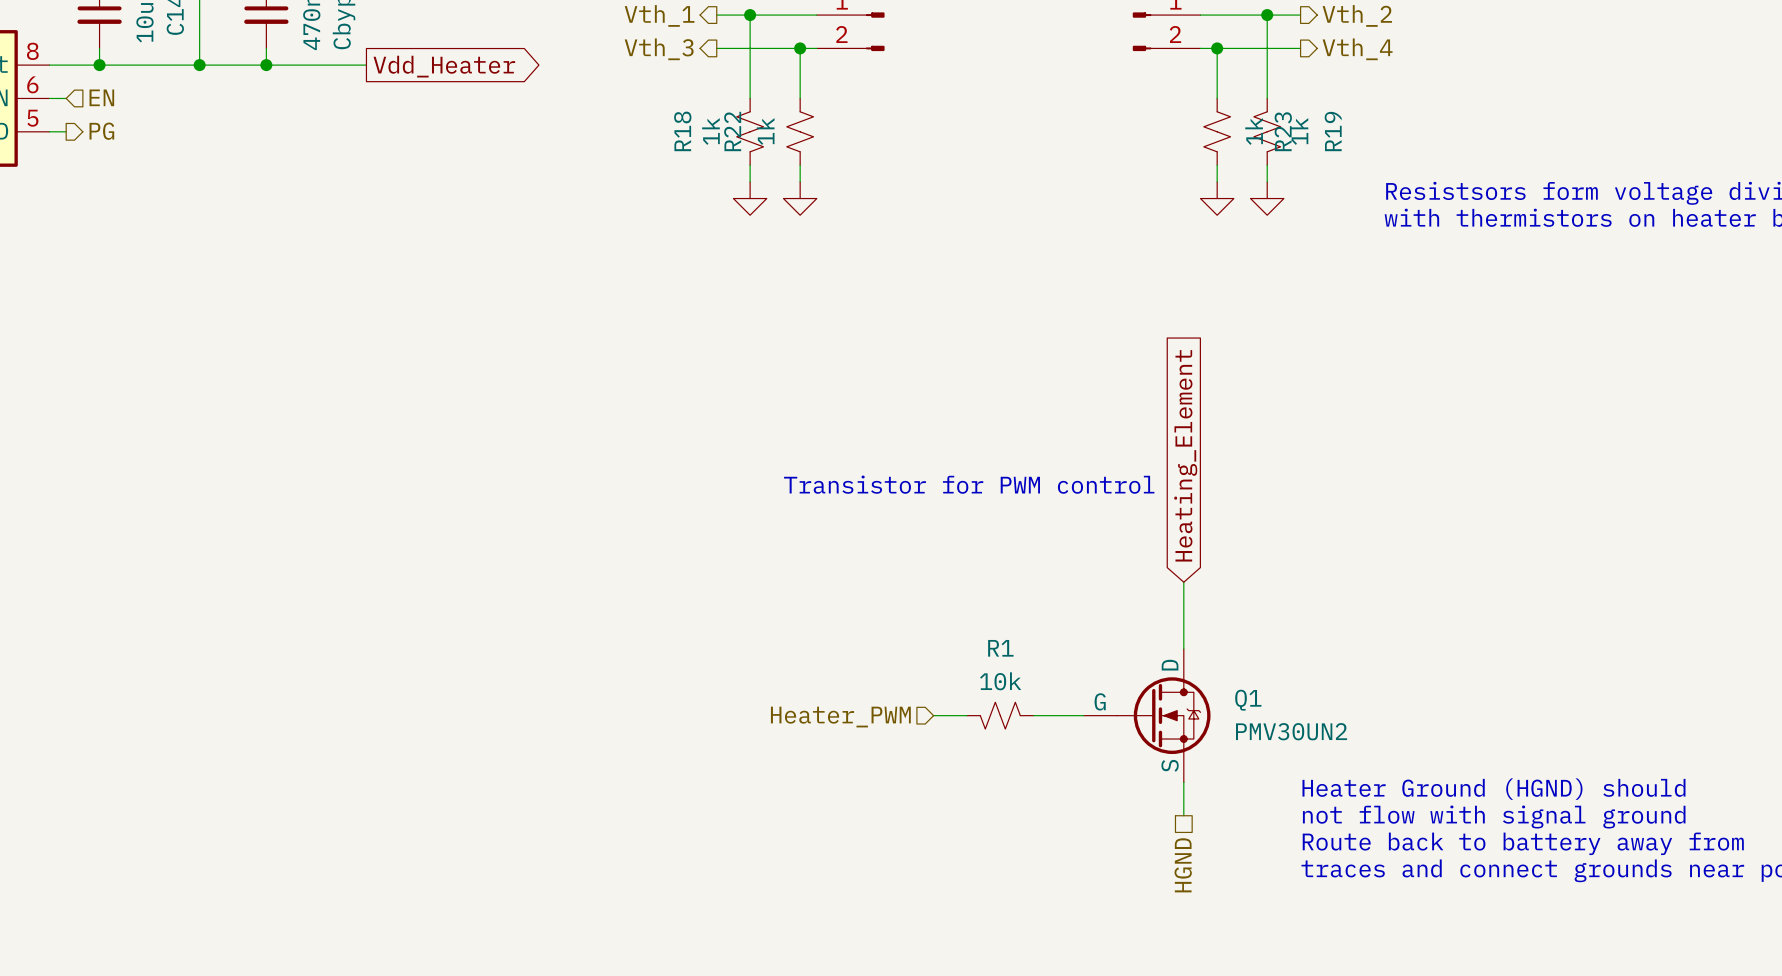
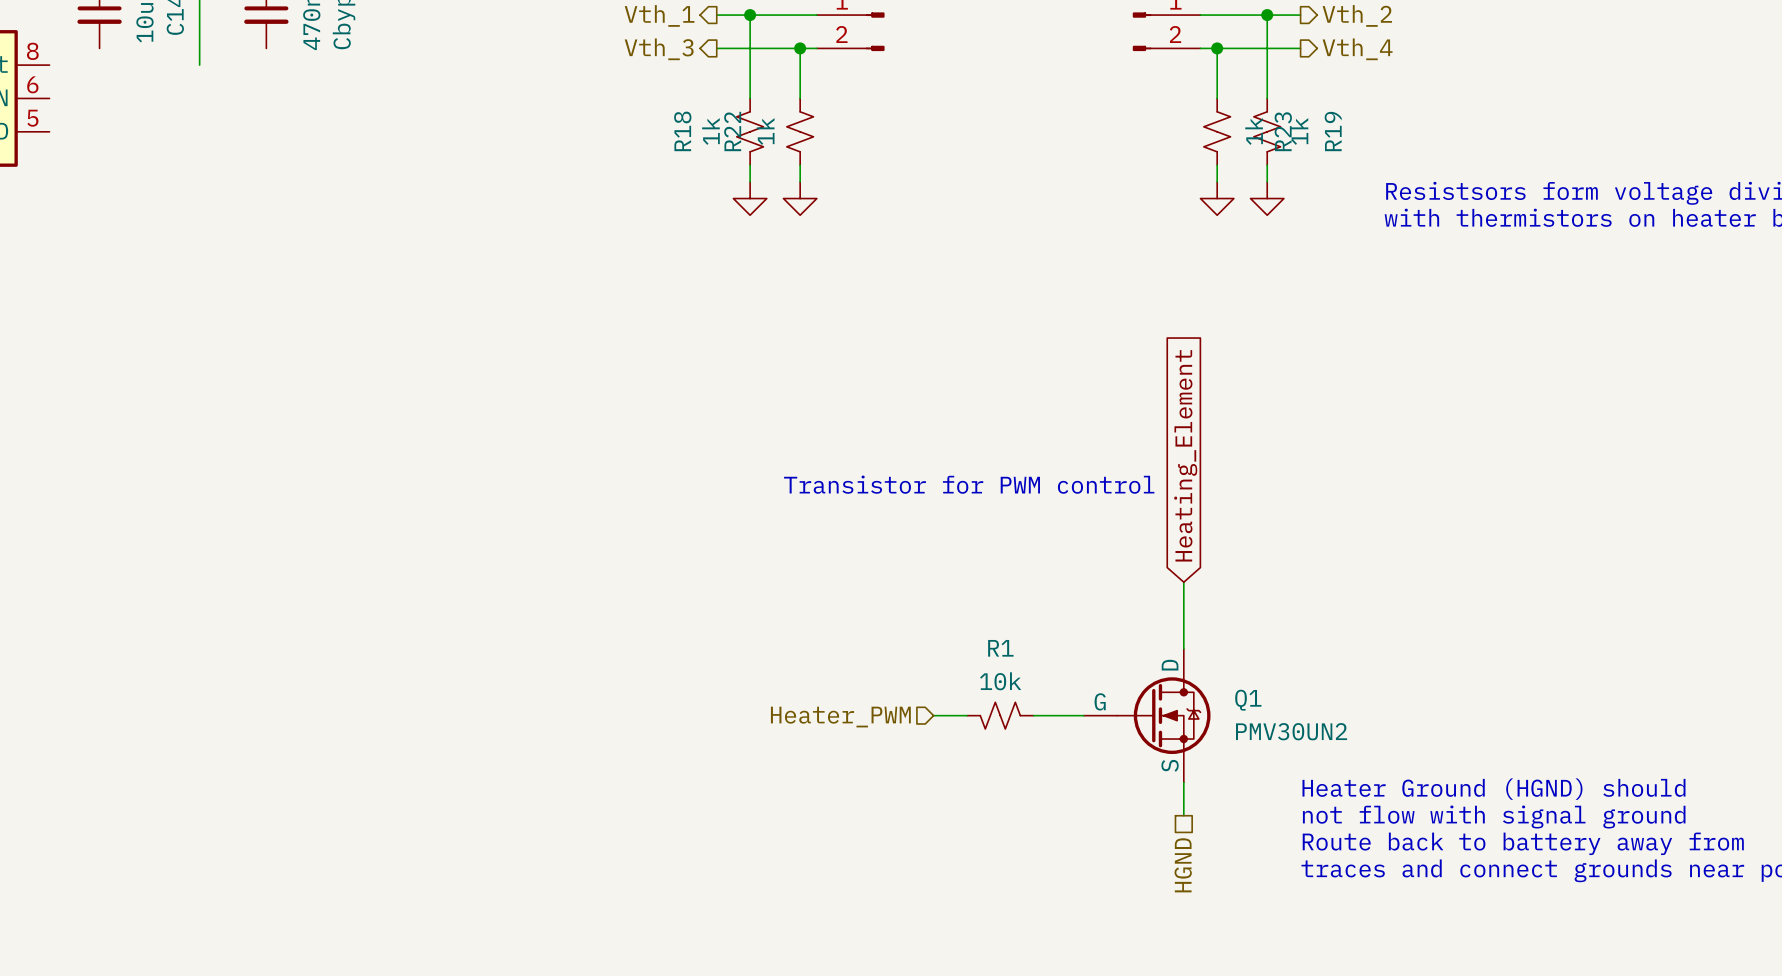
wire: (99, 48) (99, 65) -> none
wire: (266, 48) (266, 65) -> none
wire: (49, 65) (366, 65) -> none
junction: (99, 65) -> none
junction: (199, 65) -> none
junction: (266, 65) -> none
global label: Vdd_Heater (444, 66) -> none
hierarchical label: EN (101, 97) -> none
wire: (49, 98) (66, 98) -> none
wire: (49, 131) (66, 131) -> none
hierarchical label: PG (101, 131) -> none

